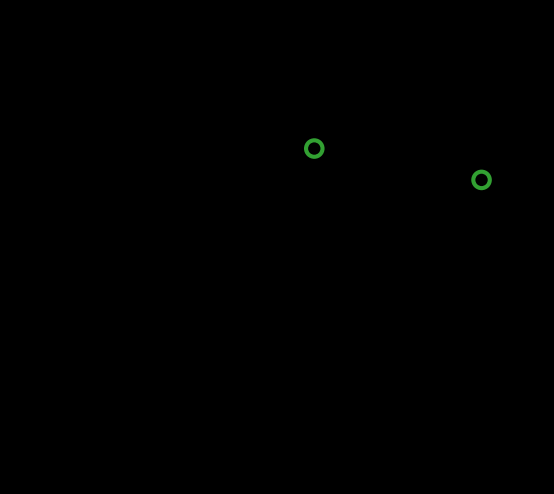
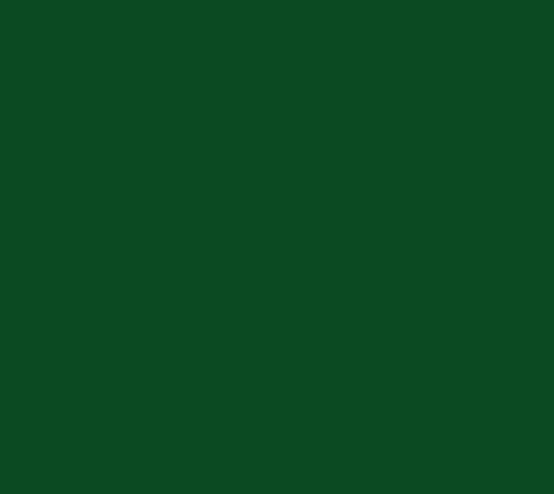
via: (314, 148) -> none
via: (481, 179) -> none

